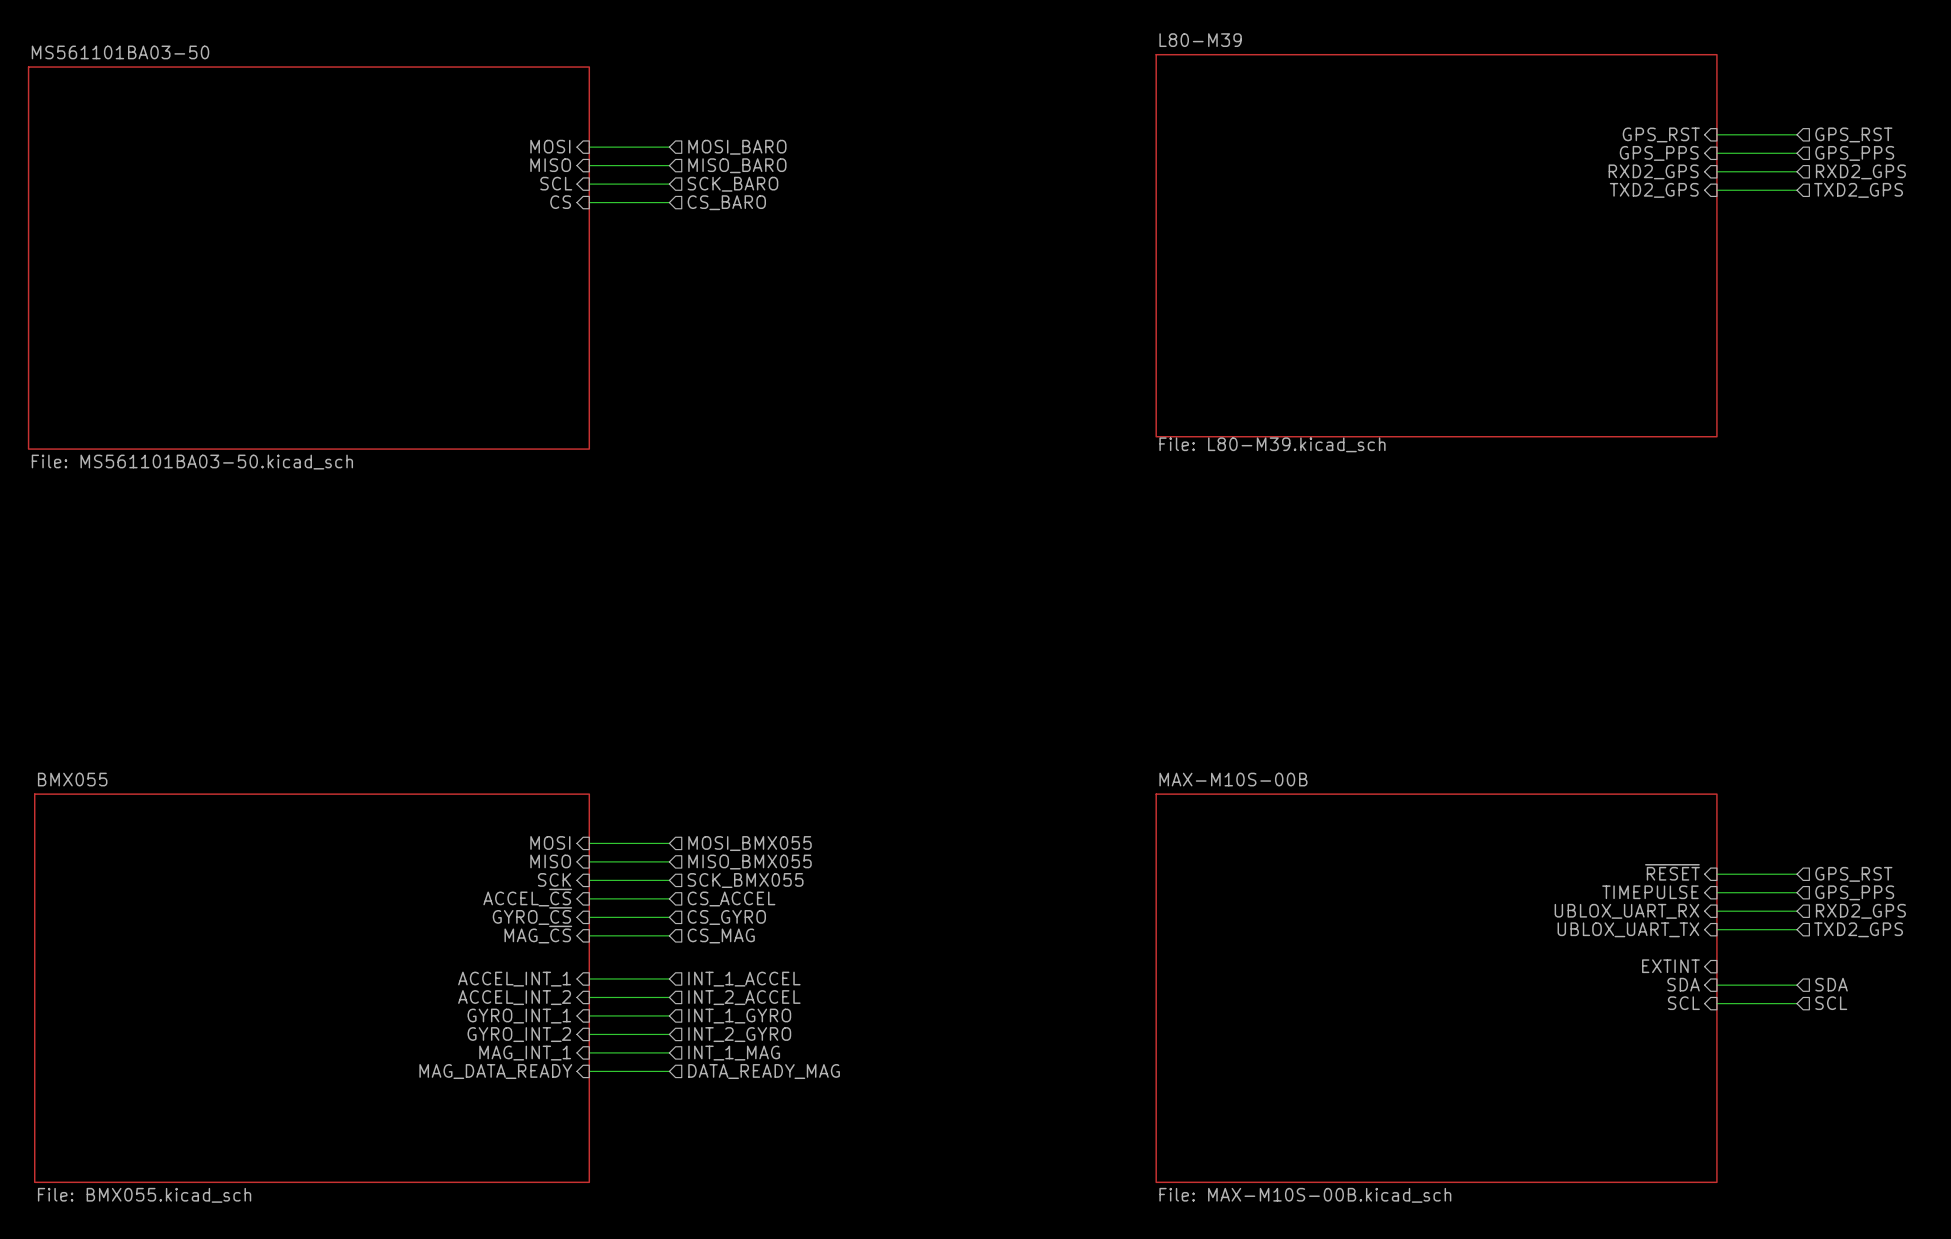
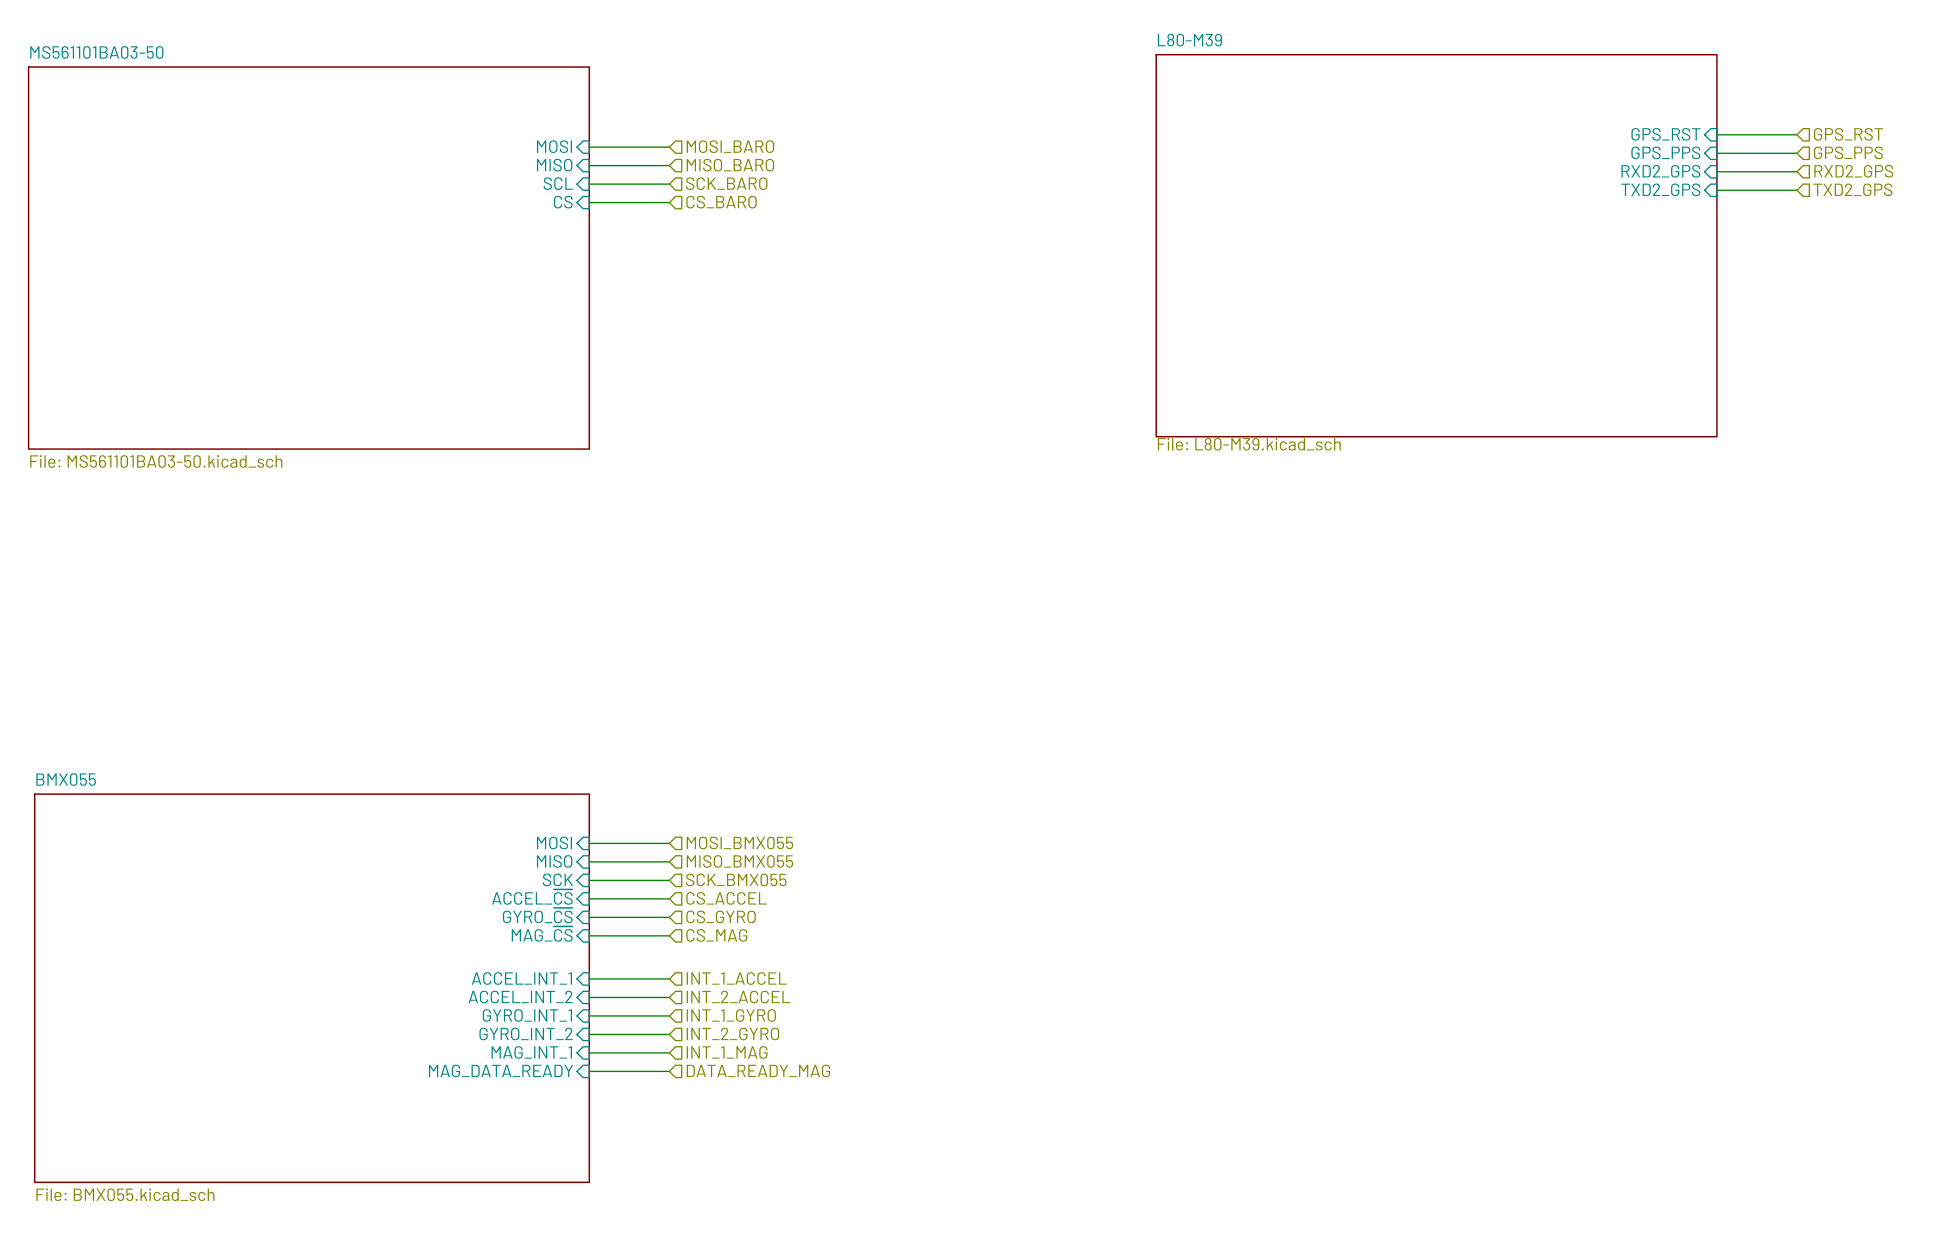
sheet pin: ~{RESET} (1672, 872) -> none
wire: (1716, 874) (1797, 874) -> none
hierarchical label: GPS_RST (1853, 874) -> none
sheet pin: TIMEPULSE (1650, 892) -> none
wire: (1716, 892) (1797, 892) -> none
hierarchical label: GPS_PPS (1854, 892) -> none
sheet pin: UBLOX_UART_RX (1626, 911) -> none
wire: (1716, 911) (1797, 911) -> none
hierarchical label: RXD2_GPS (1860, 911) -> none
sheet pin: UBLOX_UART_TX (1628, 929) -> none
wire: (1716, 929) (1797, 929) -> none
hierarchical label: TXD2_GPS (1858, 929) -> none
sheet pin: EXTINT (1670, 966) -> none
sheet pin: SDA (1683, 984) -> none
hierarchical label: SDA (1831, 984) -> none
wire: (1716, 985) (1797, 985) -> none
sheet MAX-M10S-00B: File: MAX-M10S-00B.kicad_sch (1436, 988) -> none
sheet pin: SCL (1683, 1003) -> none
wire: (1716, 1003) (1797, 1003) -> none
hierarchical label: SCL (1831, 1003) -> none

